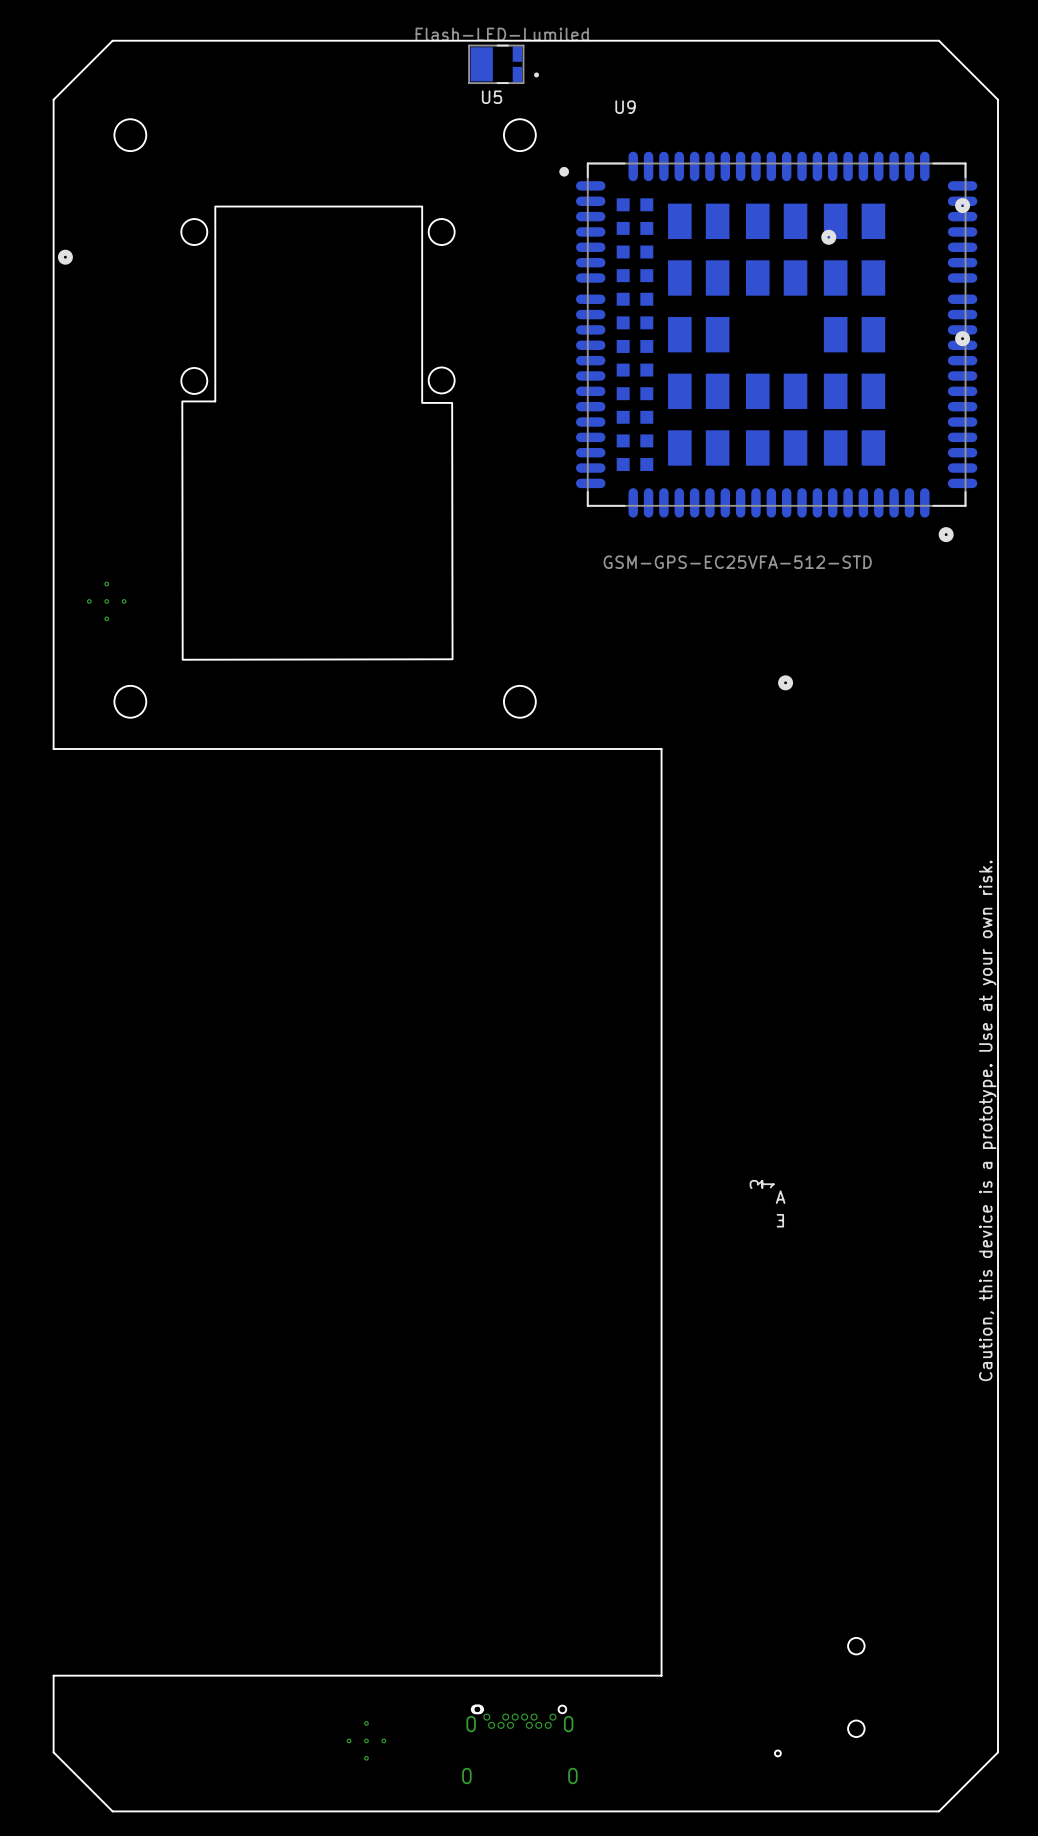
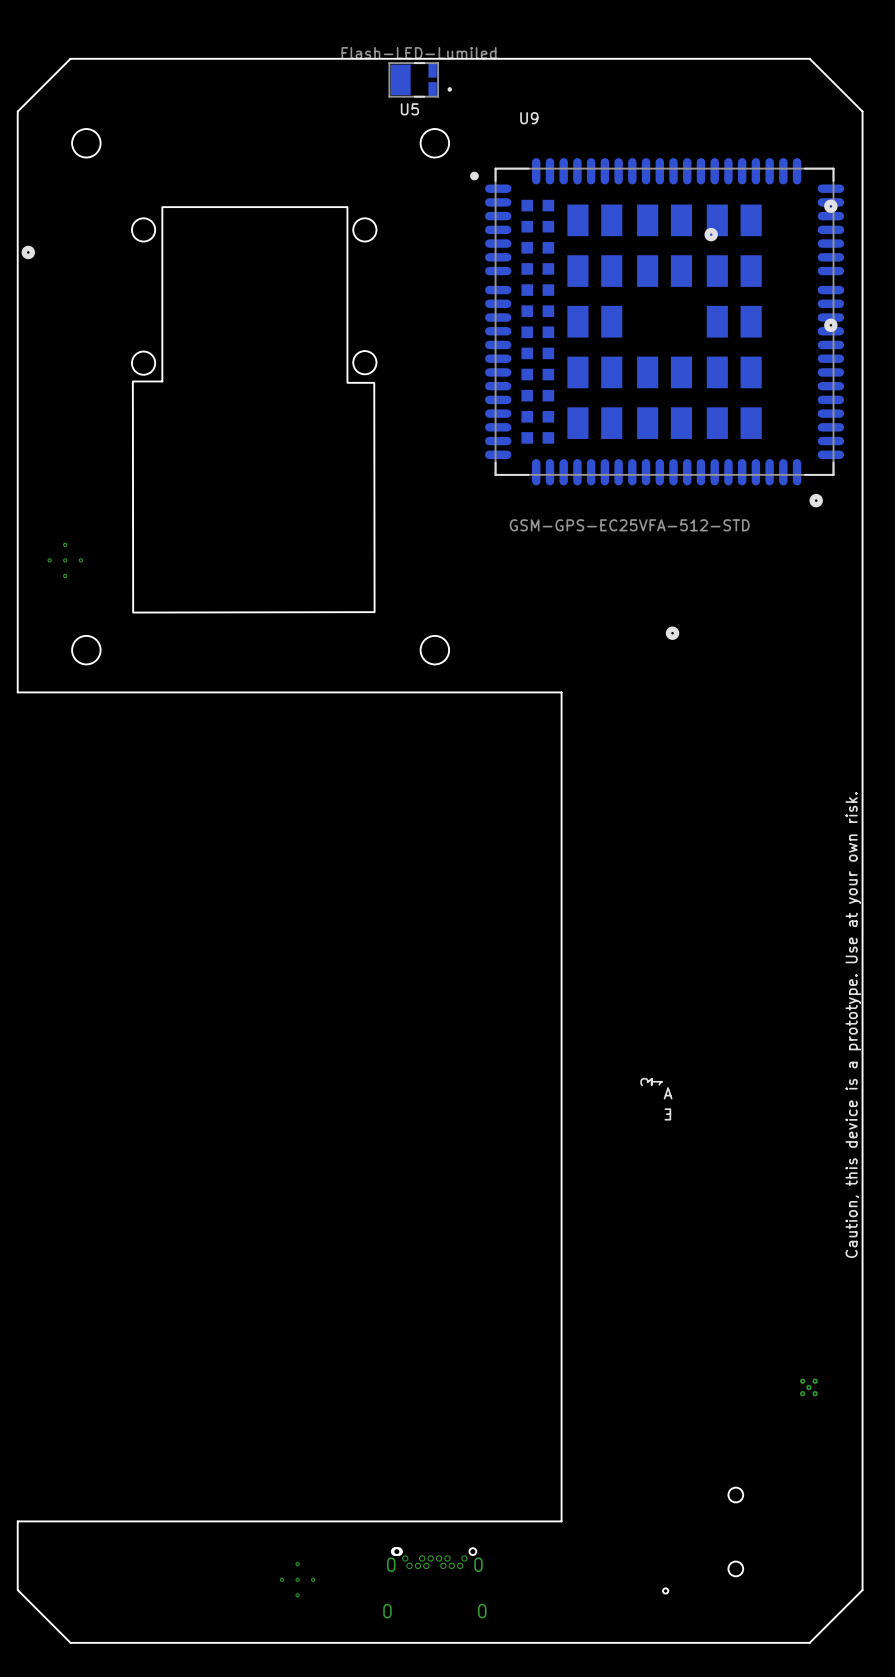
part: none -> (808, 1387)

